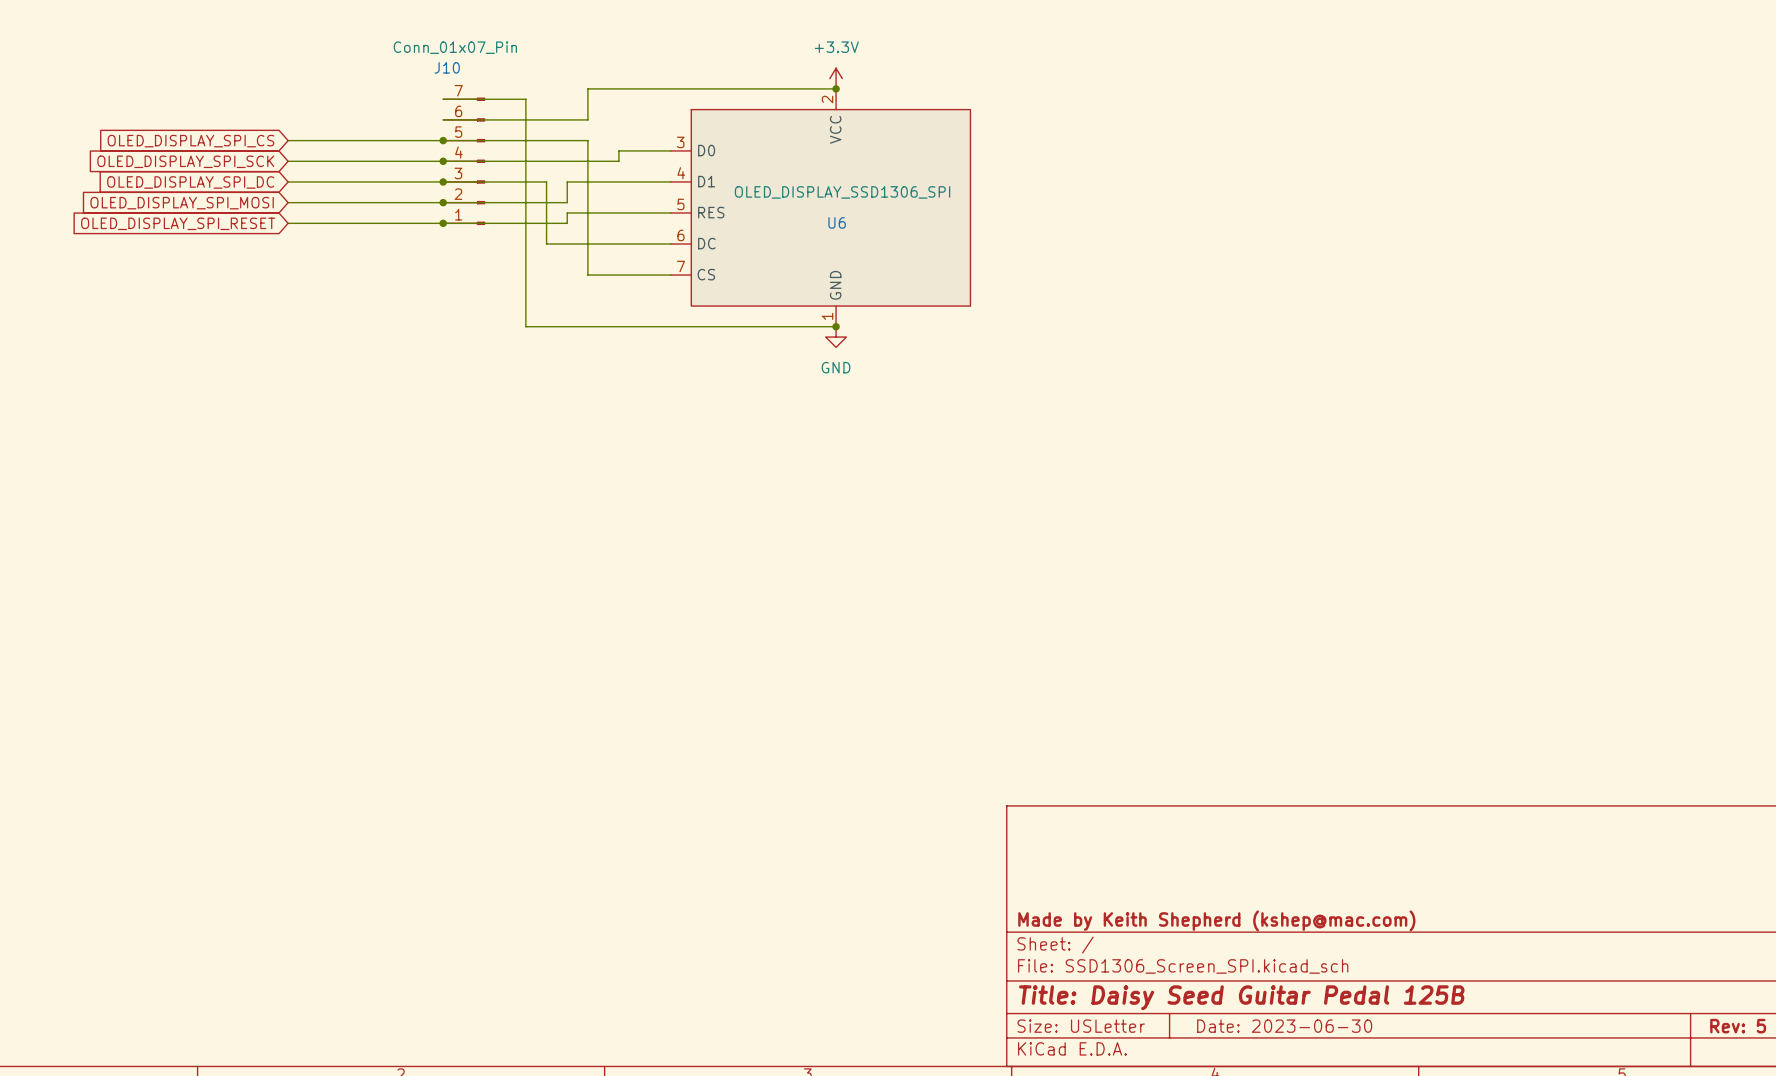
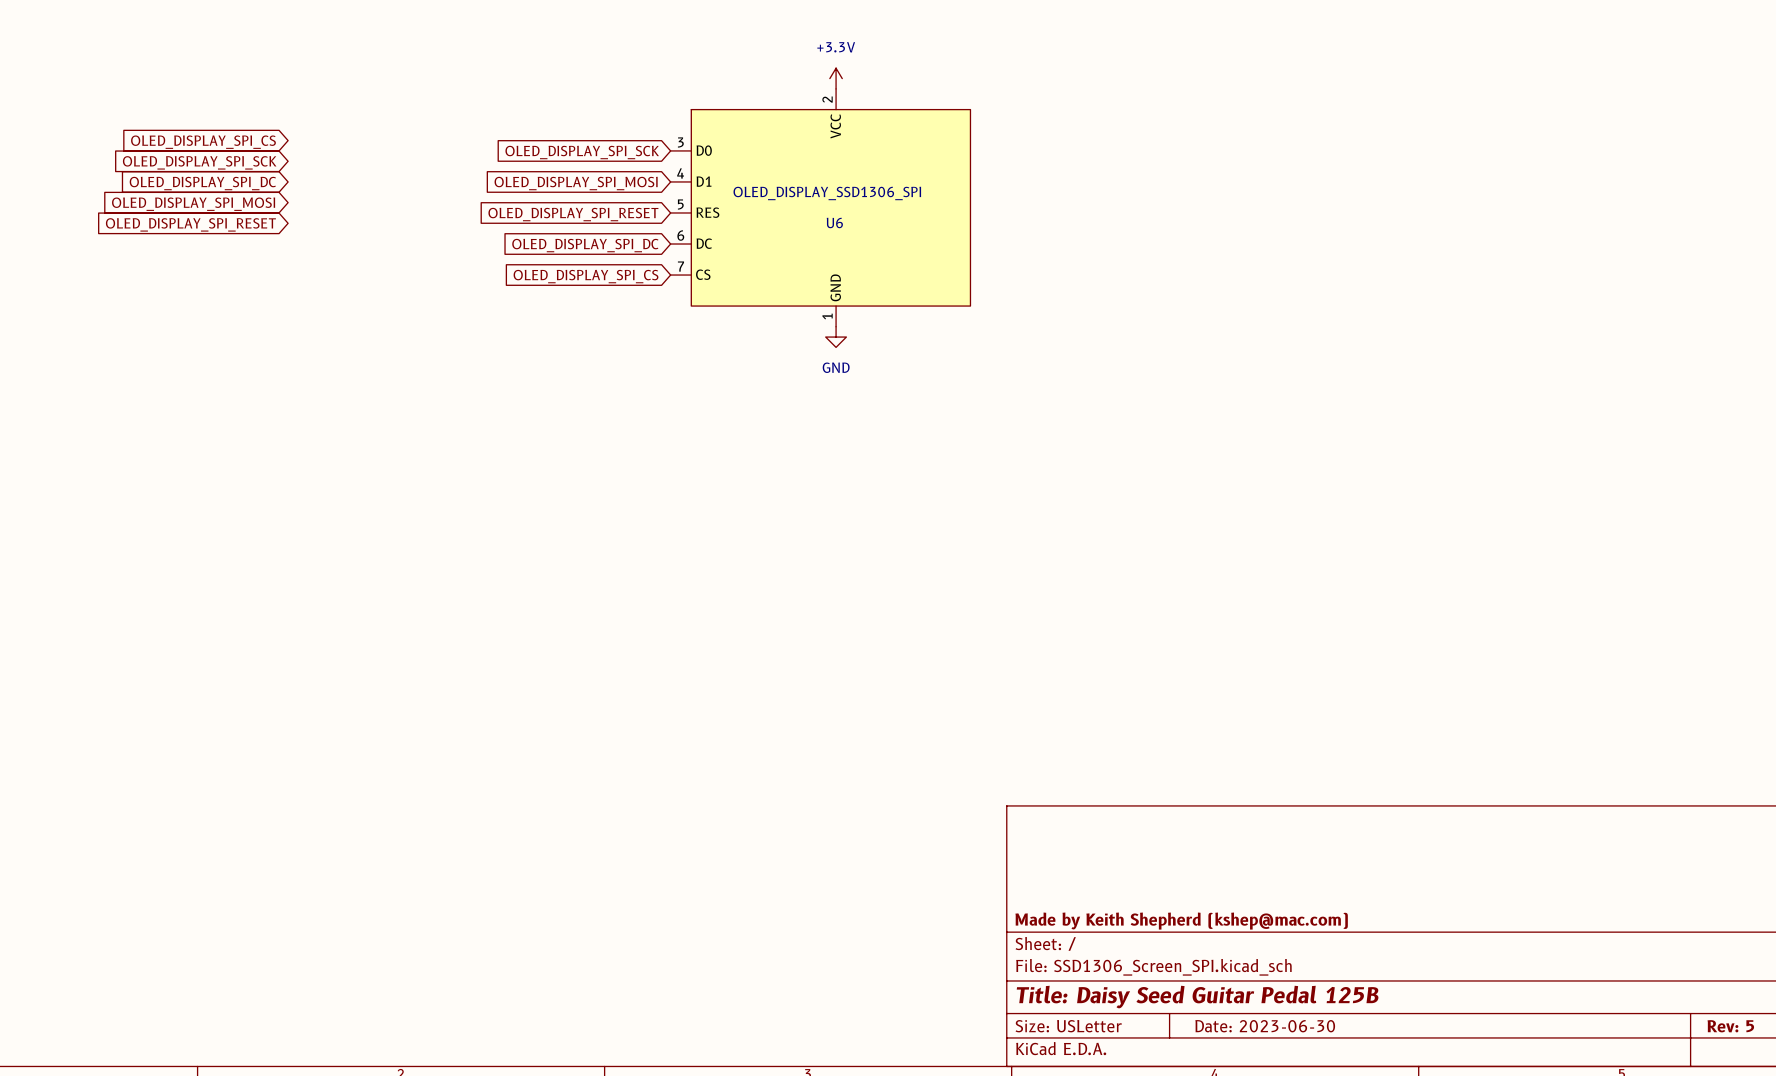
wire: (836, 88) (587, 88) (587, 119) (443, 119) -> none
junction: (836, 88) -> none
wire: (443, 99) (525, 99) (525, 326) (836, 326) -> none
wire: (288, 140) (587, 140) (587, 275) (670, 275) -> none
junction: (443, 140) -> none
wire: (670, 150) (618, 150) (618, 161) (288, 161) -> none
global label: none -> OLED_DISPLAY_SPI_SCK (582, 152)
junction: (443, 161) -> none
J10: Conn_01x07_Pin (464, 161) -> none
wire: (288, 181) (546, 181) (546, 244) (670, 244) -> none
junction: (443, 181) -> none
wire: (670, 181) (567, 181) (567, 202) (288, 202) -> none
global label: none -> OLED_DISPLAY_SPI_MOSI (576, 183)
junction: (443, 202) -> none
wire: (670, 212) (567, 212) (567, 223) (288, 223) -> none
global label: none -> OLED_DISPLAY_SPI_RESET (573, 214)
junction: (443, 223) -> none
global label: none -> OLED_DISPLAY_SPI_DC (585, 245)
global label: none -> OLED_DISPLAY_SPI_CS (586, 276)
junction: (836, 326) -> none

